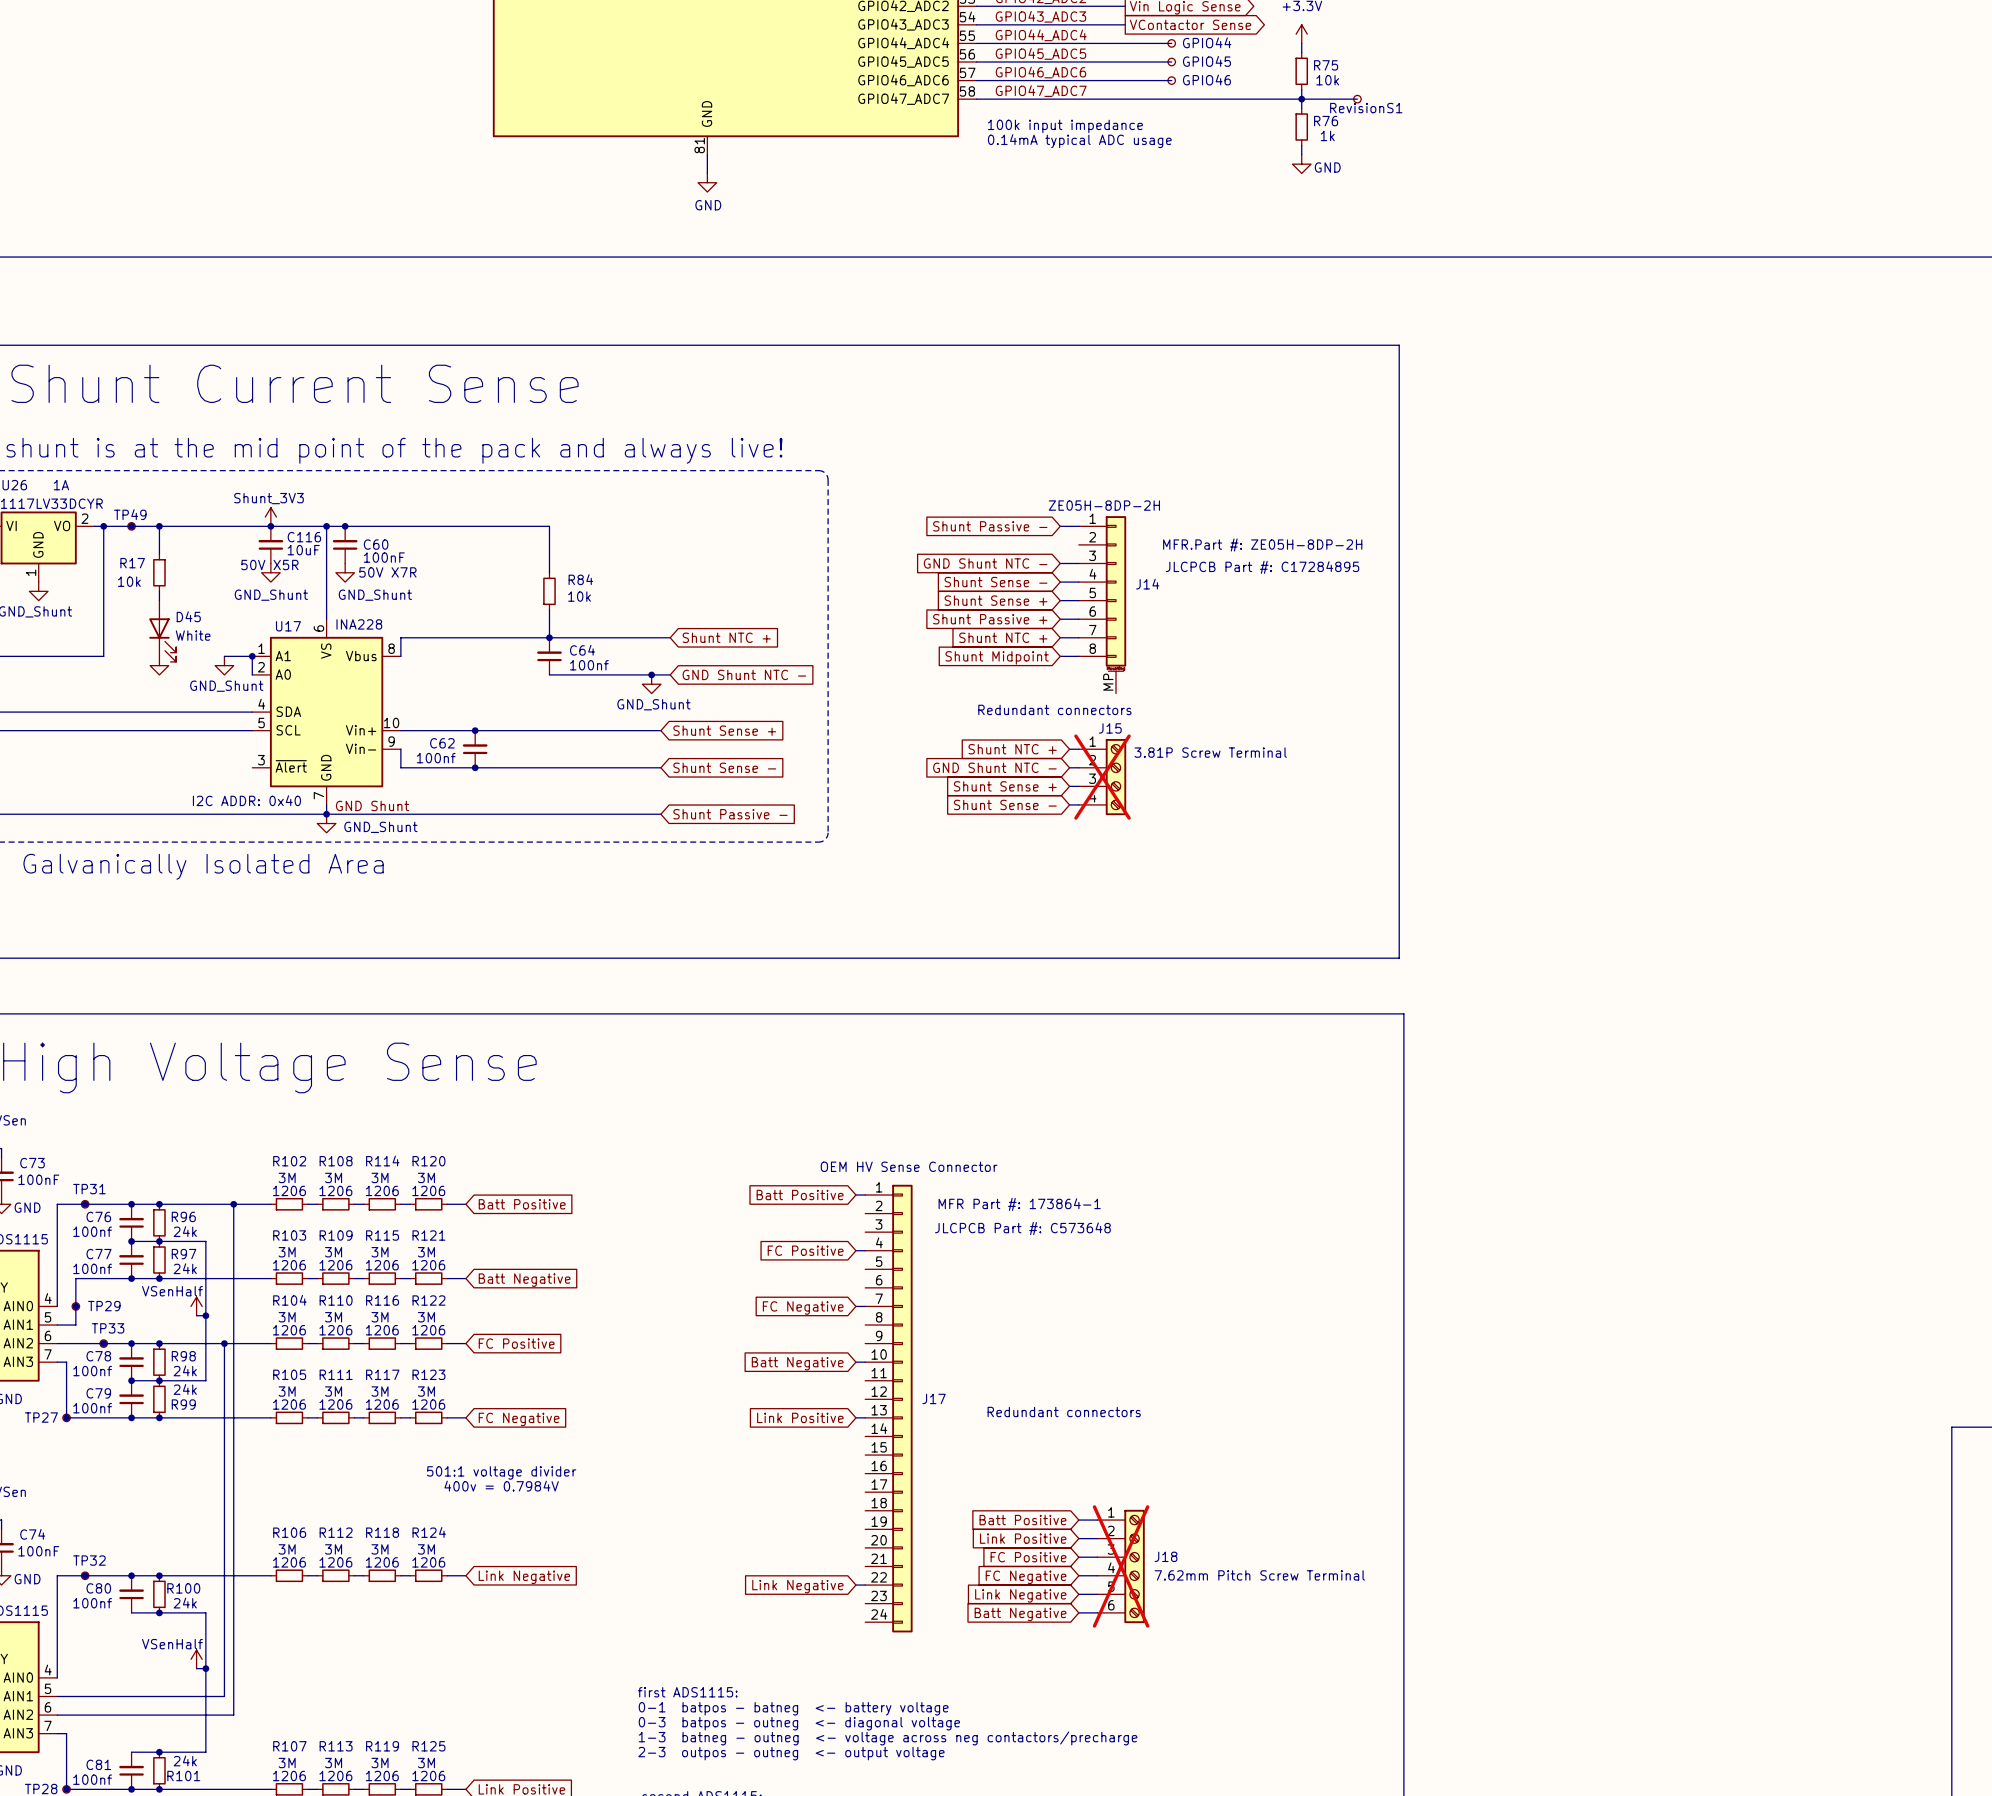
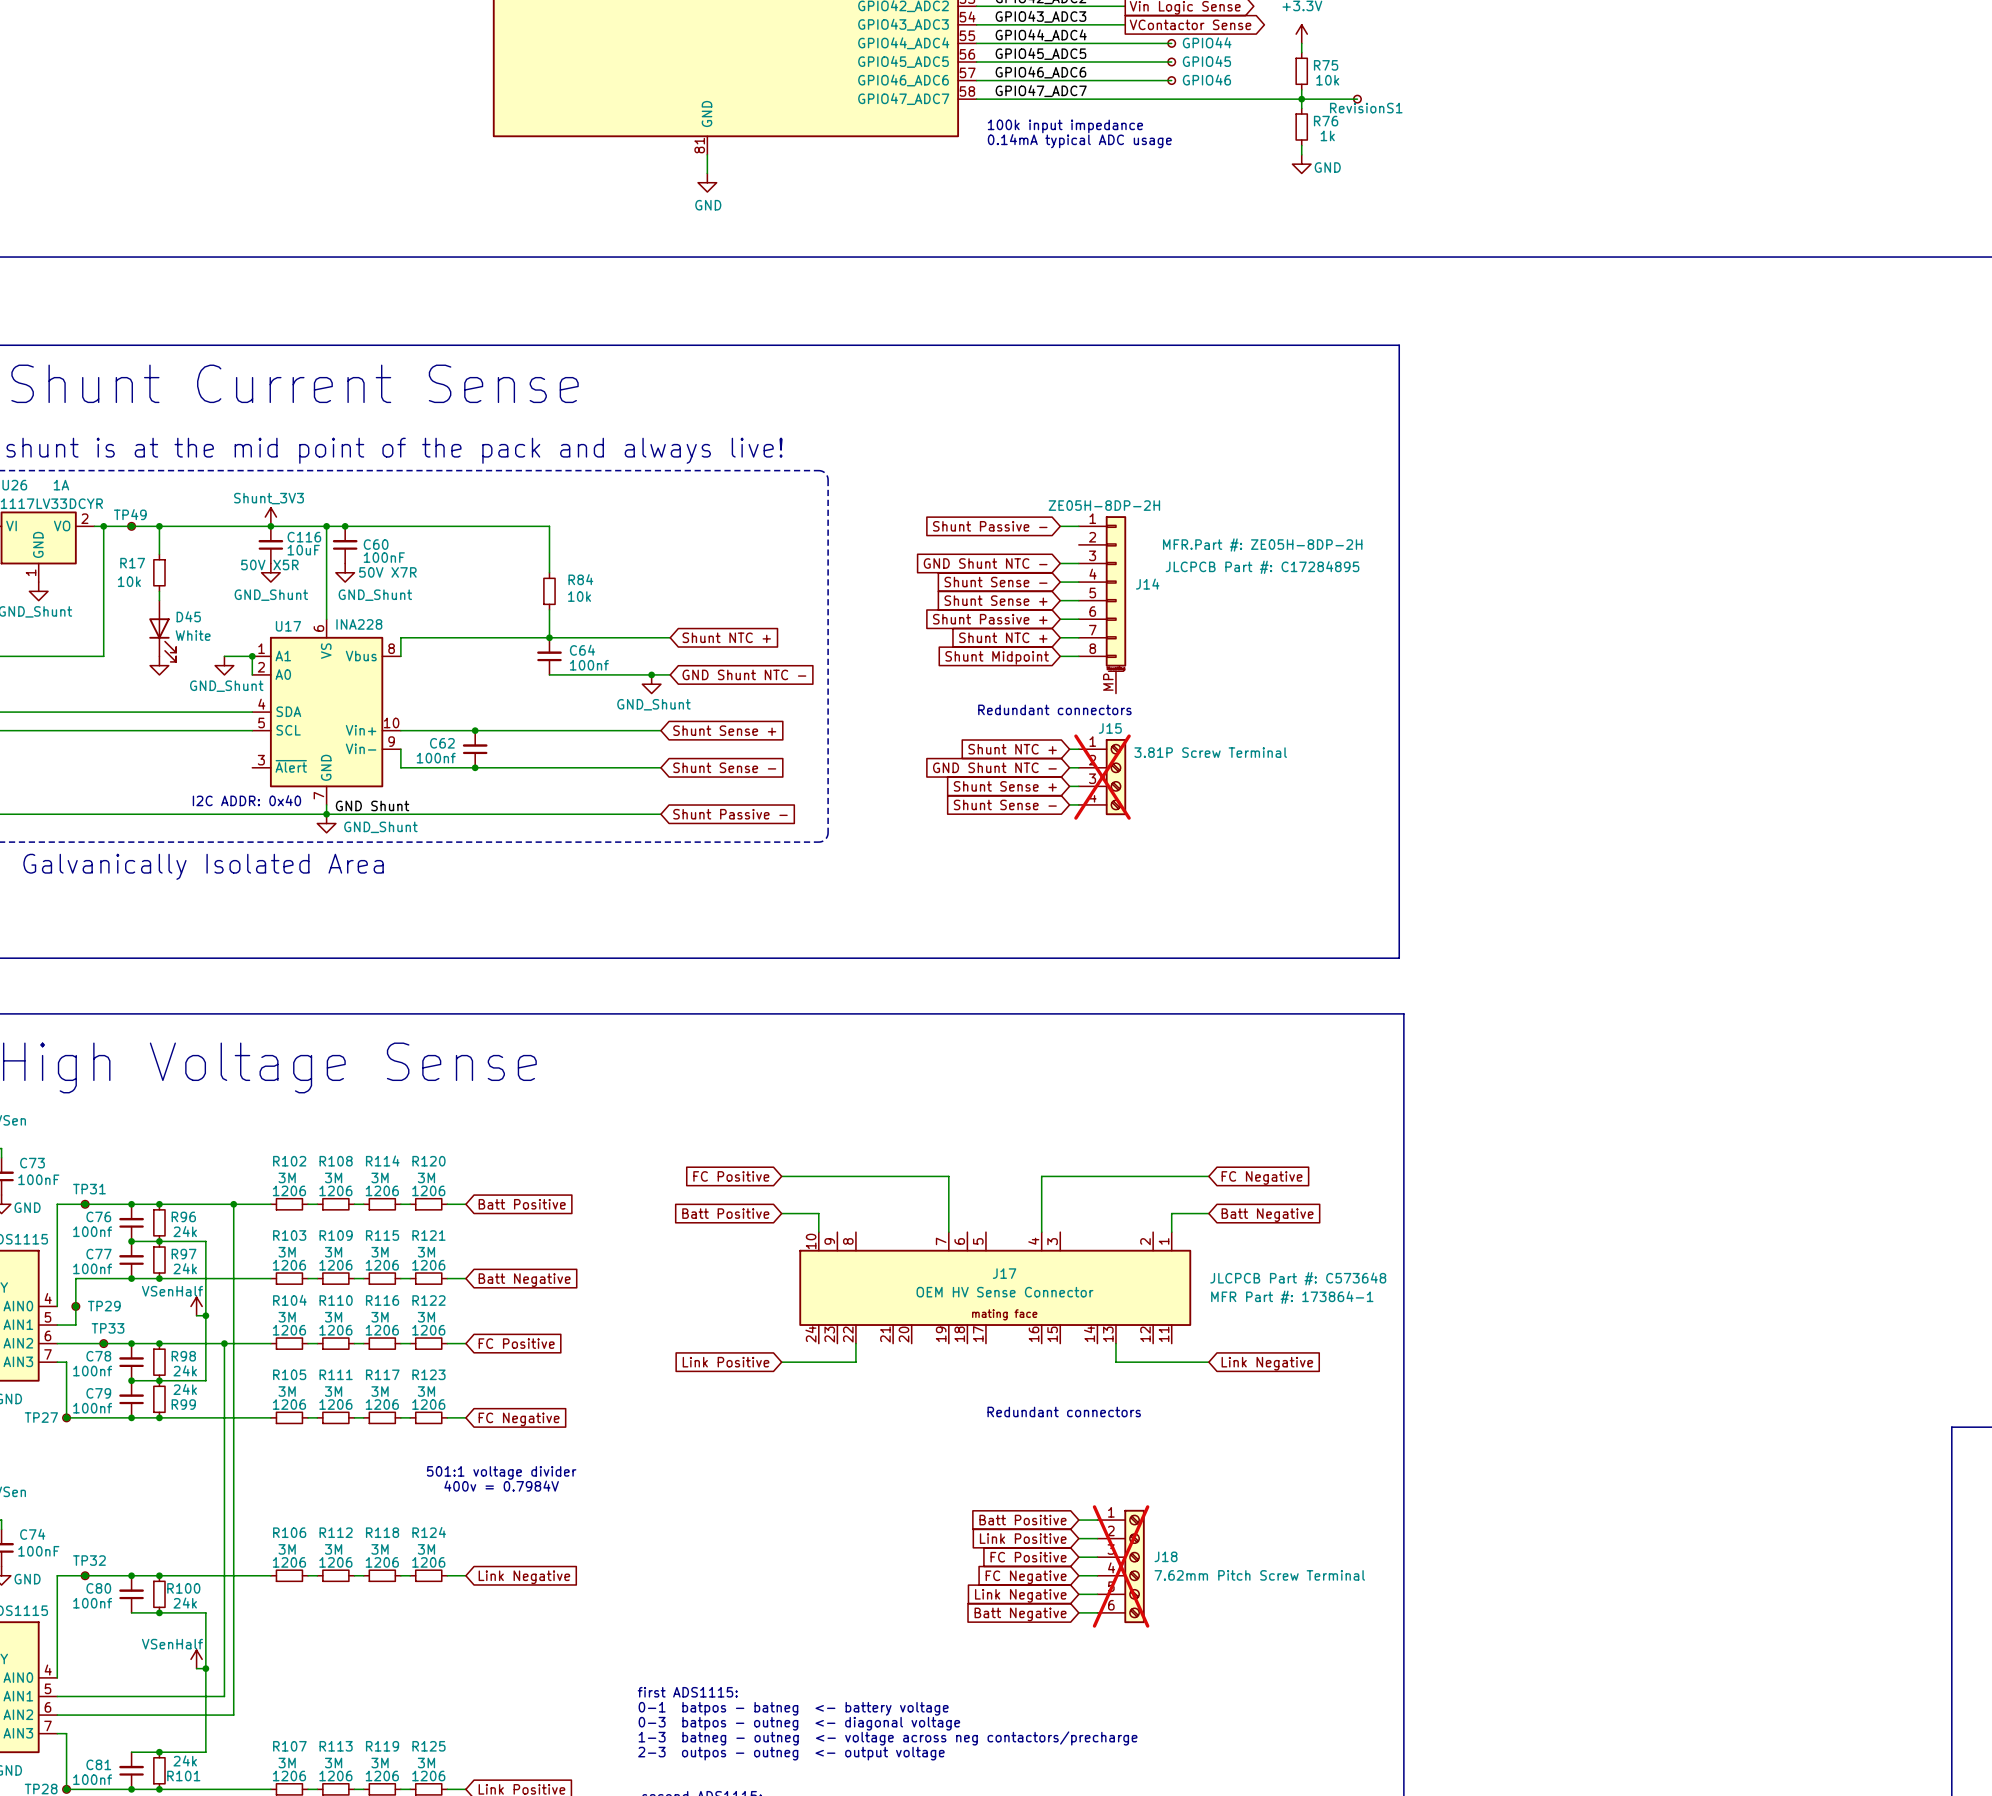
J17 value position: OEM HV Sense Connector (909, 1166) -> OEM HV Sense Connector (1004, 1292)
wire: none -> (781, 1176) (948, 1176) (948, 1232)
wire: none -> (1208, 1176) (1041, 1176) (1041, 1232)
global label: none -> FC Negative (1262, 1177)
J17 symbol: [865, 1184, 913, 1633] -> [799, 1232, 1192, 1344]
global label position: Batt Positive (800, 1195) -> Batt Positive (725, 1213)
wire: (855, 1195) (865, 1195) -> none
J17 text position: MFR Part #: 173864-1 (1019, 1204) -> MFR Part #: 173864-1 (1292, 1297)
wire: none -> (781, 1213) (818, 1213) (818, 1232)
wire: none -> (1208, 1213) (1171, 1213) (1171, 1232)
global label: none -> Batt Negative (1267, 1215)
J17 text position: JLCPCB Part #: C573648 (1022, 1228) -> JLCPCB Part #: C573648 (1298, 1278)
global label position: FC Positive (805, 1250) -> FC Positive (731, 1176)
global label: FC Negative (803, 1307) -> none
wire: none -> (855, 1343) (855, 1362) (781, 1362)
wire: none -> (1115, 1343) (1115, 1362) (1208, 1362)
wire: (855, 1362) (865, 1362) -> none
global label: Batt Negative (797, 1363) -> none
global label: none -> Link Negative (1267, 1363)
J17 name position: J17 (934, 1398) -> J17 (1004, 1273)
global label position: Link Positive (800, 1417) -> Link Positive (726, 1362)
wire: (855, 1417) (865, 1417) -> none
wire: (855, 1585) (865, 1585) -> none
global label: Link Negative (797, 1586) -> none

